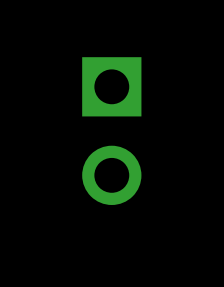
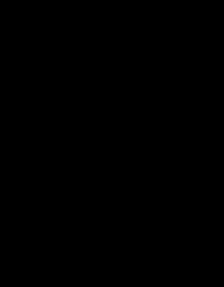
part: (111, 131) -> none

